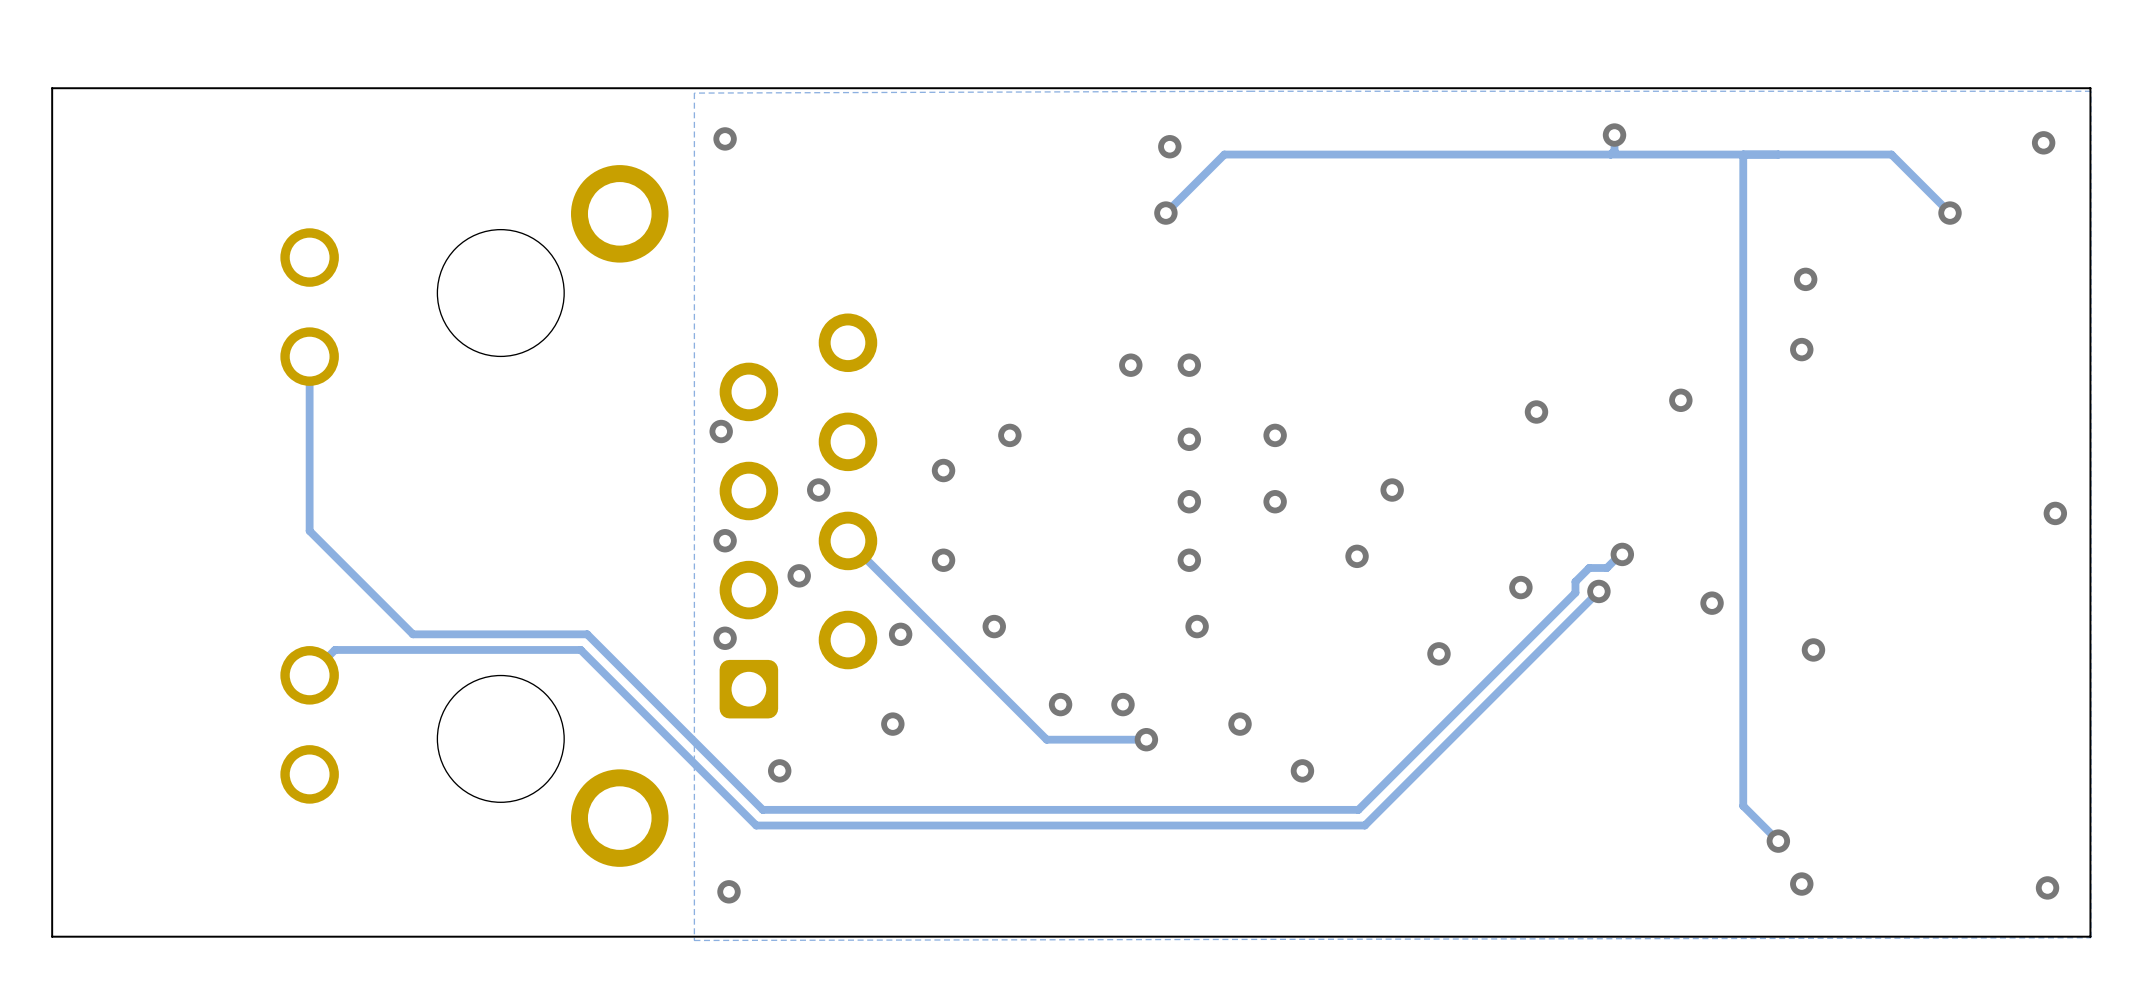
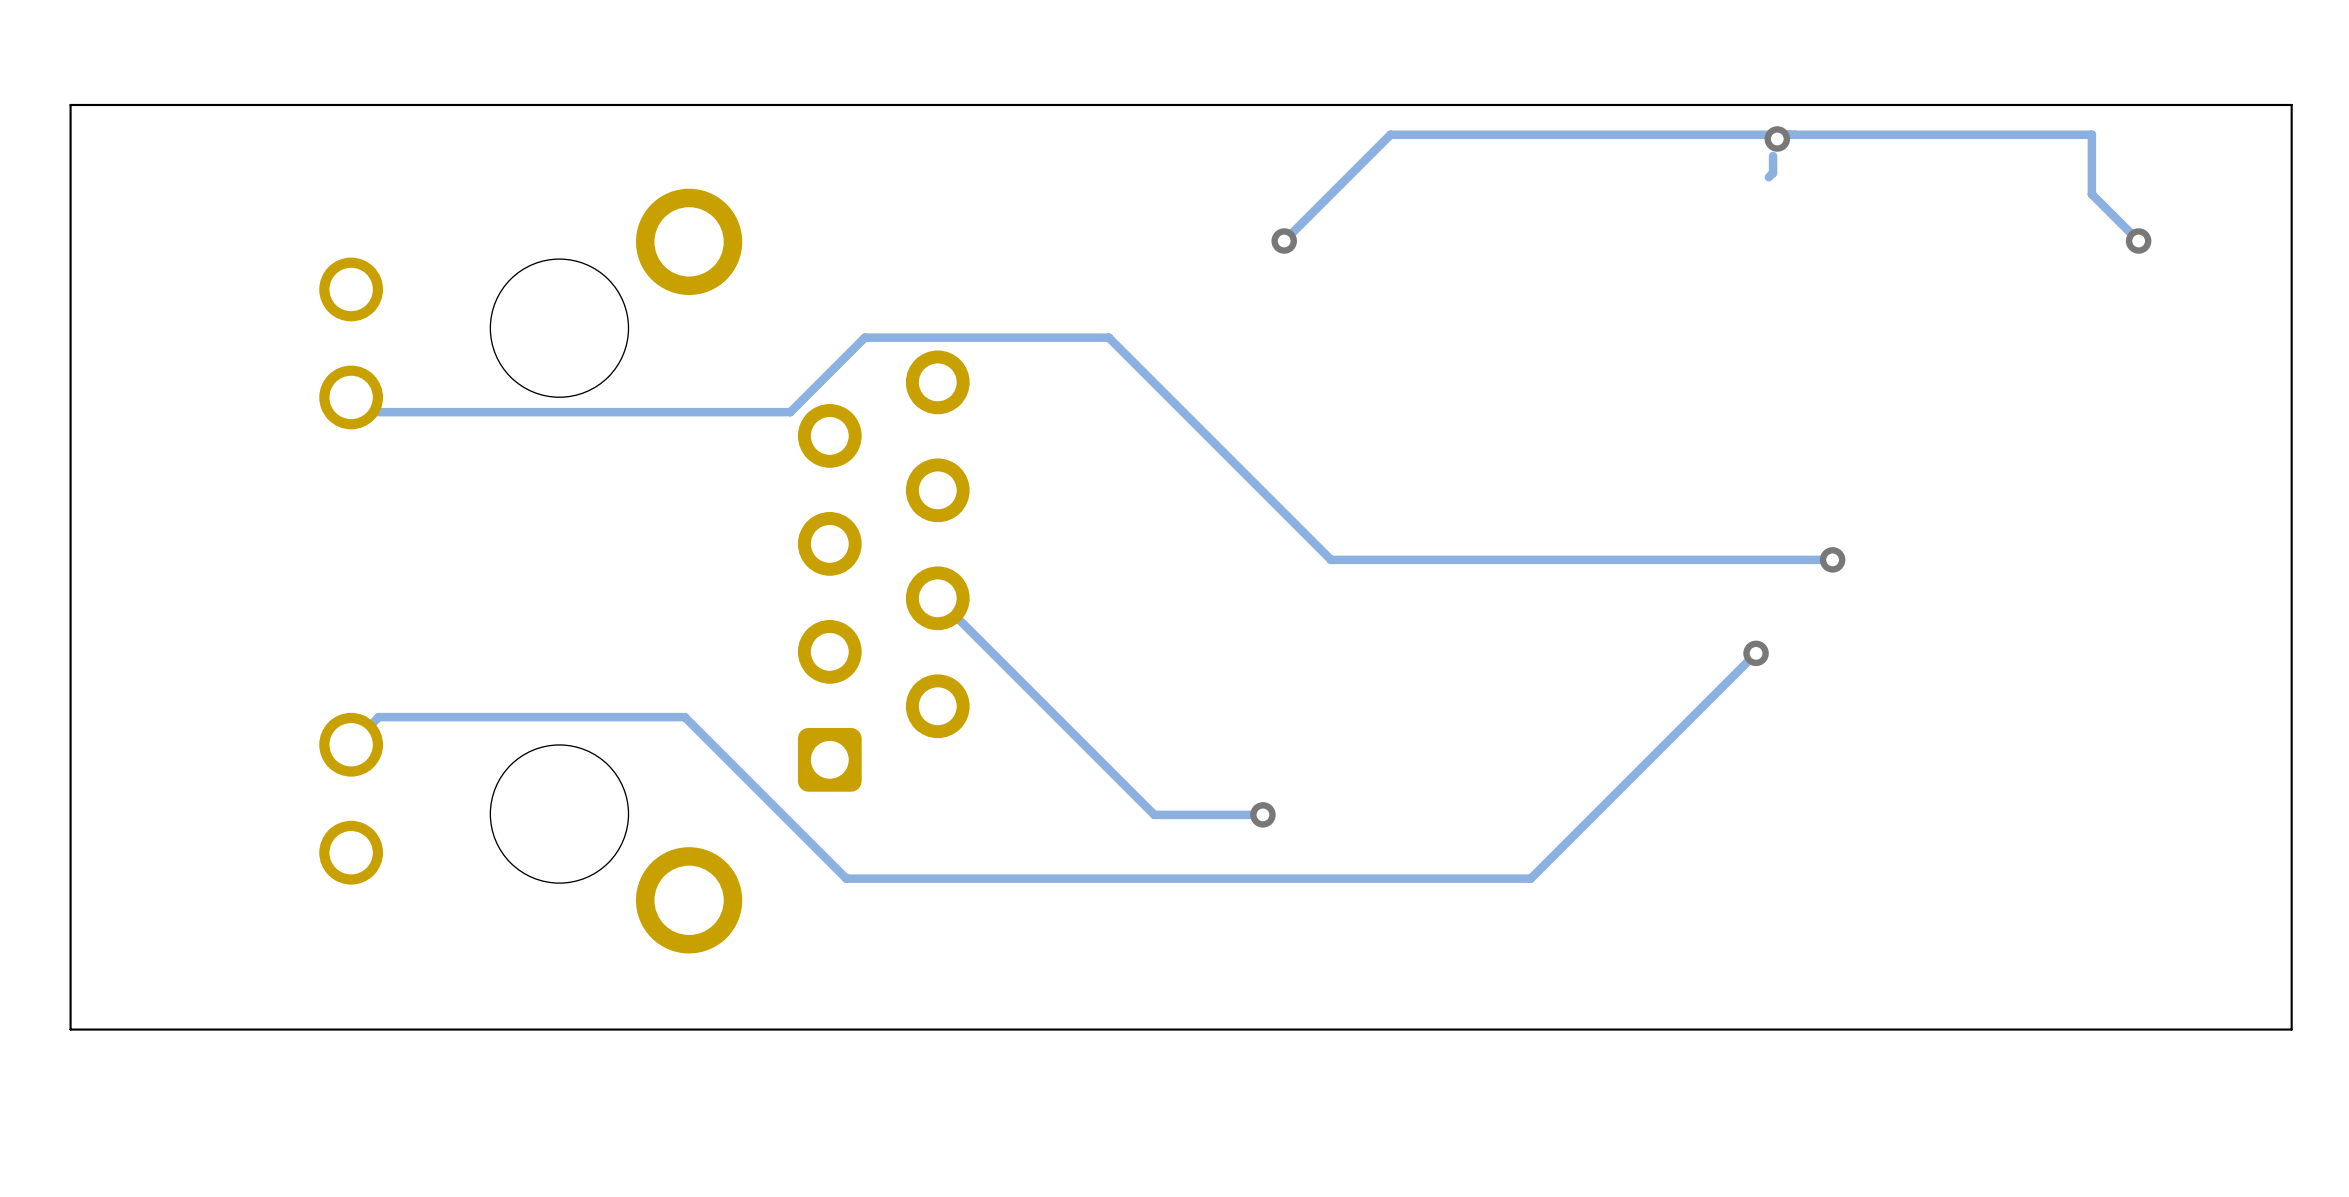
zone outline: (2090, 91) (2090, 937) (694, 940) (694, 93) (2090, 91) -> none
via position: (1614, 135) -> (1777, 138)
via: (725, 138) -> none
via: (2043, 142) -> none
via: (1169, 146) -> none
track: (1224, 154) (1891, 154) (1907, 170) -> (1347, 177) (1390, 134) (2091, 134) (2091, 194)
track: (1743, 154) (1743, 806) (1778, 841) -> none
via: (1805, 279) -> none
via: (1801, 349) -> none
track: (309, 356) (309, 530) (412, 634) (587, 634) (762, 809) (1358, 809) (1575, 592) (1575, 581) (1589, 568) (1606, 568) (1622, 554) -> (351, 397) (365, 412) (790, 412) (864, 337) (1108, 337) (1331, 559) (1832, 559)
via: (1130, 365) -> none
via: (1189, 365) -> none
via: (1680, 400) -> none
via: (1536, 412) -> none
via: (721, 431) -> none
via: (1009, 435) -> none
via: (1275, 435) -> none
via: (1189, 439) -> none
via: (943, 470) -> none
via: (818, 490) -> none
via: (1392, 490) -> none
via: (1189, 501) -> none
via: (1275, 501) -> none
via: none -> (1832, 559)
via: (2055, 513) -> none
via: (725, 540) -> none
via: (1622, 554) -> none
via: (1357, 556) -> none
via: (943, 560) -> none
via: (1189, 560) -> none
via: (799, 575) -> none
via: (1520, 587) -> none
via: (1712, 603) -> none
via: (994, 626) -> none
via: (1197, 626) -> none
via: (900, 634) -> none
via: (725, 638) -> none
track: (580, 649) (756, 825) (1364, 825) (1392, 798) -> (646, 717) (684, 717) (846, 878) (1530, 878)
via: (1813, 649) -> none
via: (1438, 653) -> none
via: (1060, 704) -> none
via: (1122, 704) -> none
via: (892, 724) -> none
via: (1240, 724) -> none
via: (779, 770) -> none
via: (1302, 770) -> none
via: (1778, 841) -> none
via: (1801, 884) -> none
via: (2047, 887) -> none
via: (728, 891) -> none

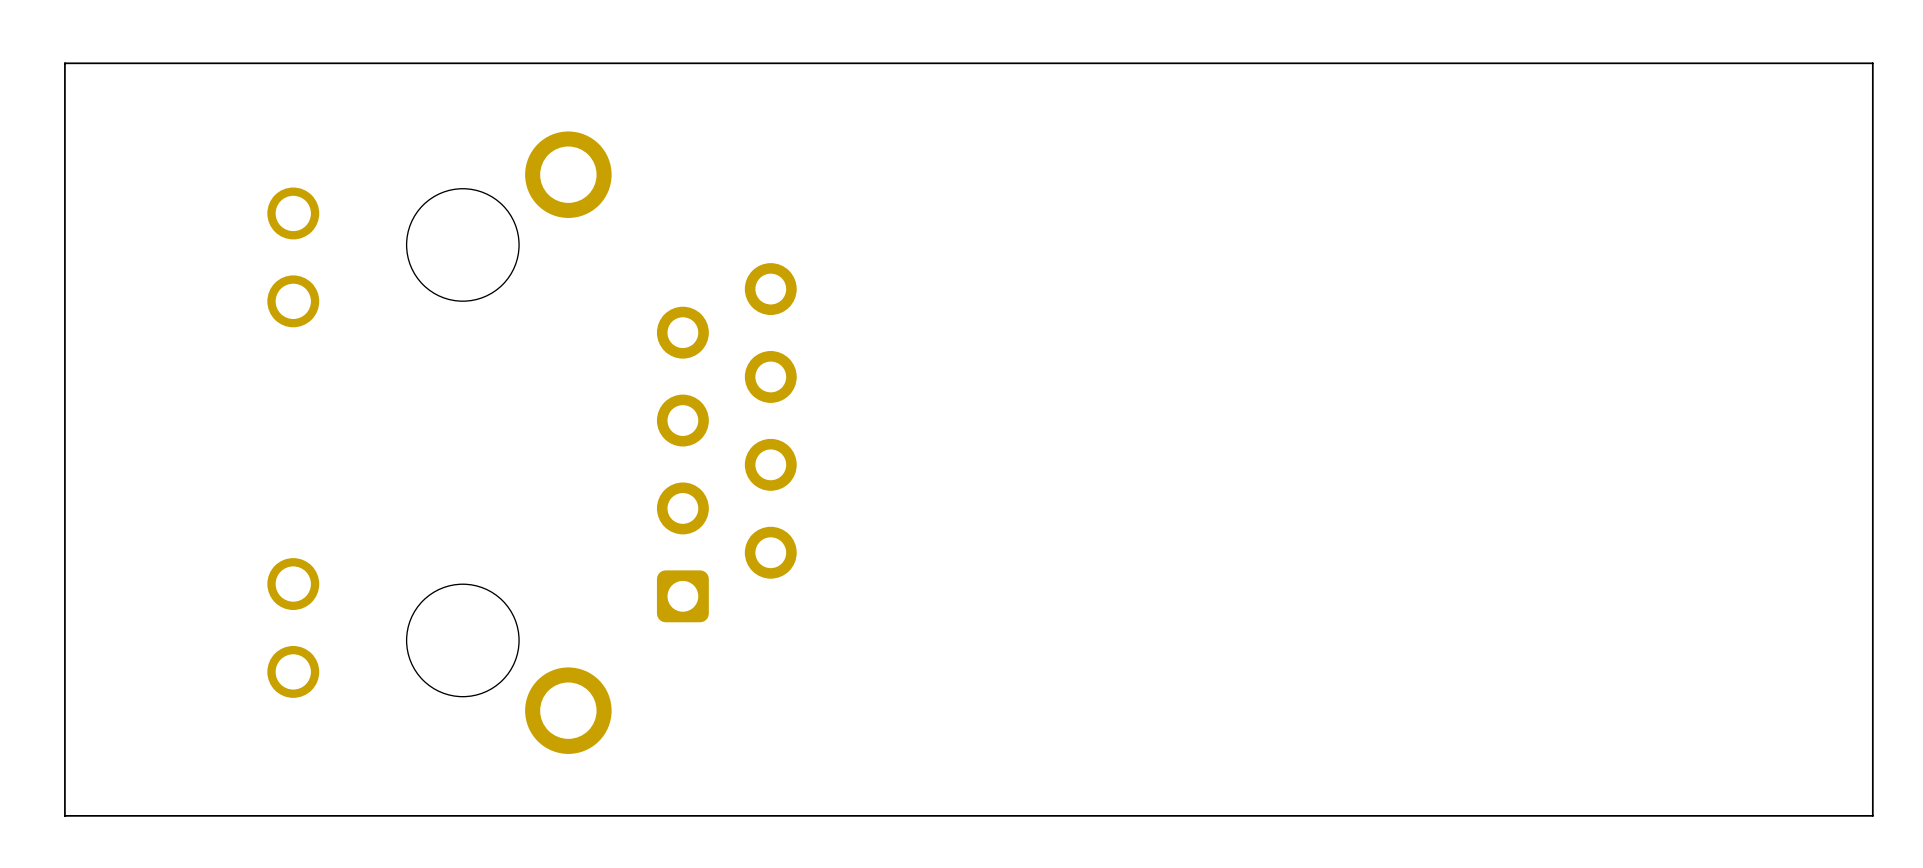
via: (1777, 138) -> none
track: (1773, 155) (1773, 173) (1768, 177) -> none
via: (1284, 241) -> none
track: (2138, 241) (2091, 194) (2091, 134) (1390, 134) (1284, 241) -> none
via: (2138, 241) -> none
track: (351, 397) (365, 412) (790, 412) (864, 337) (1108, 337) (1331, 559) (1832, 559) -> none
via: (1832, 559) -> none
track: (937, 598) (1154, 814) (1262, 814) -> none
track: (1756, 653) (1530, 878) (846, 878) (684, 717) (378, 717) (351, 744) -> none
via: (1756, 653) -> none
via: (1262, 814) -> none

